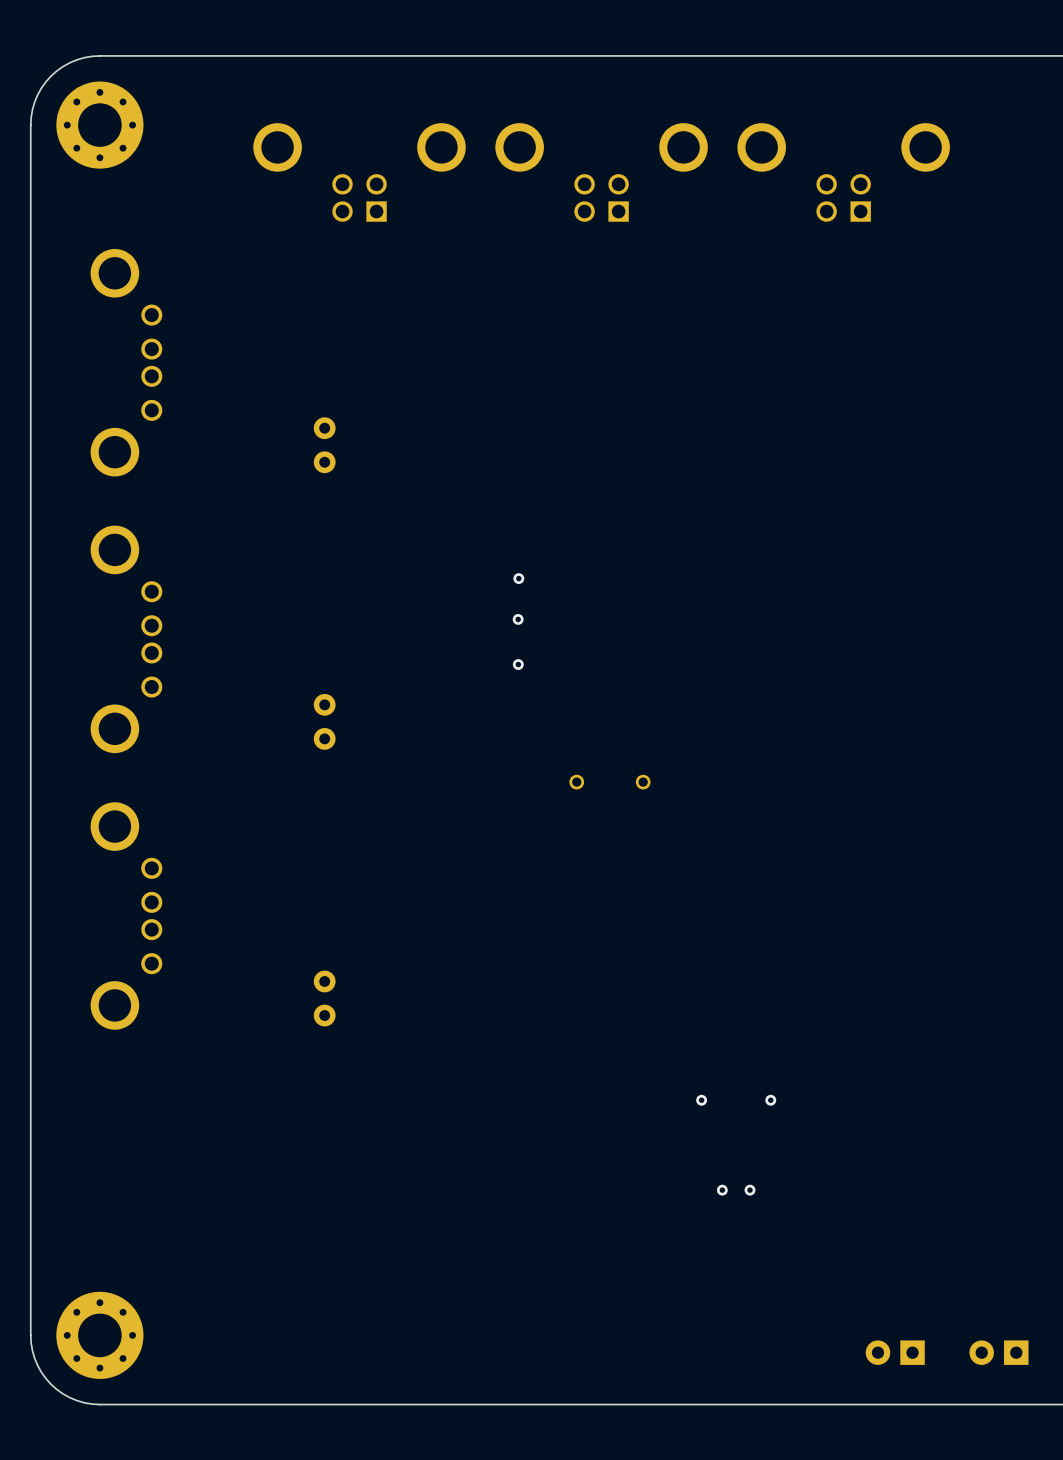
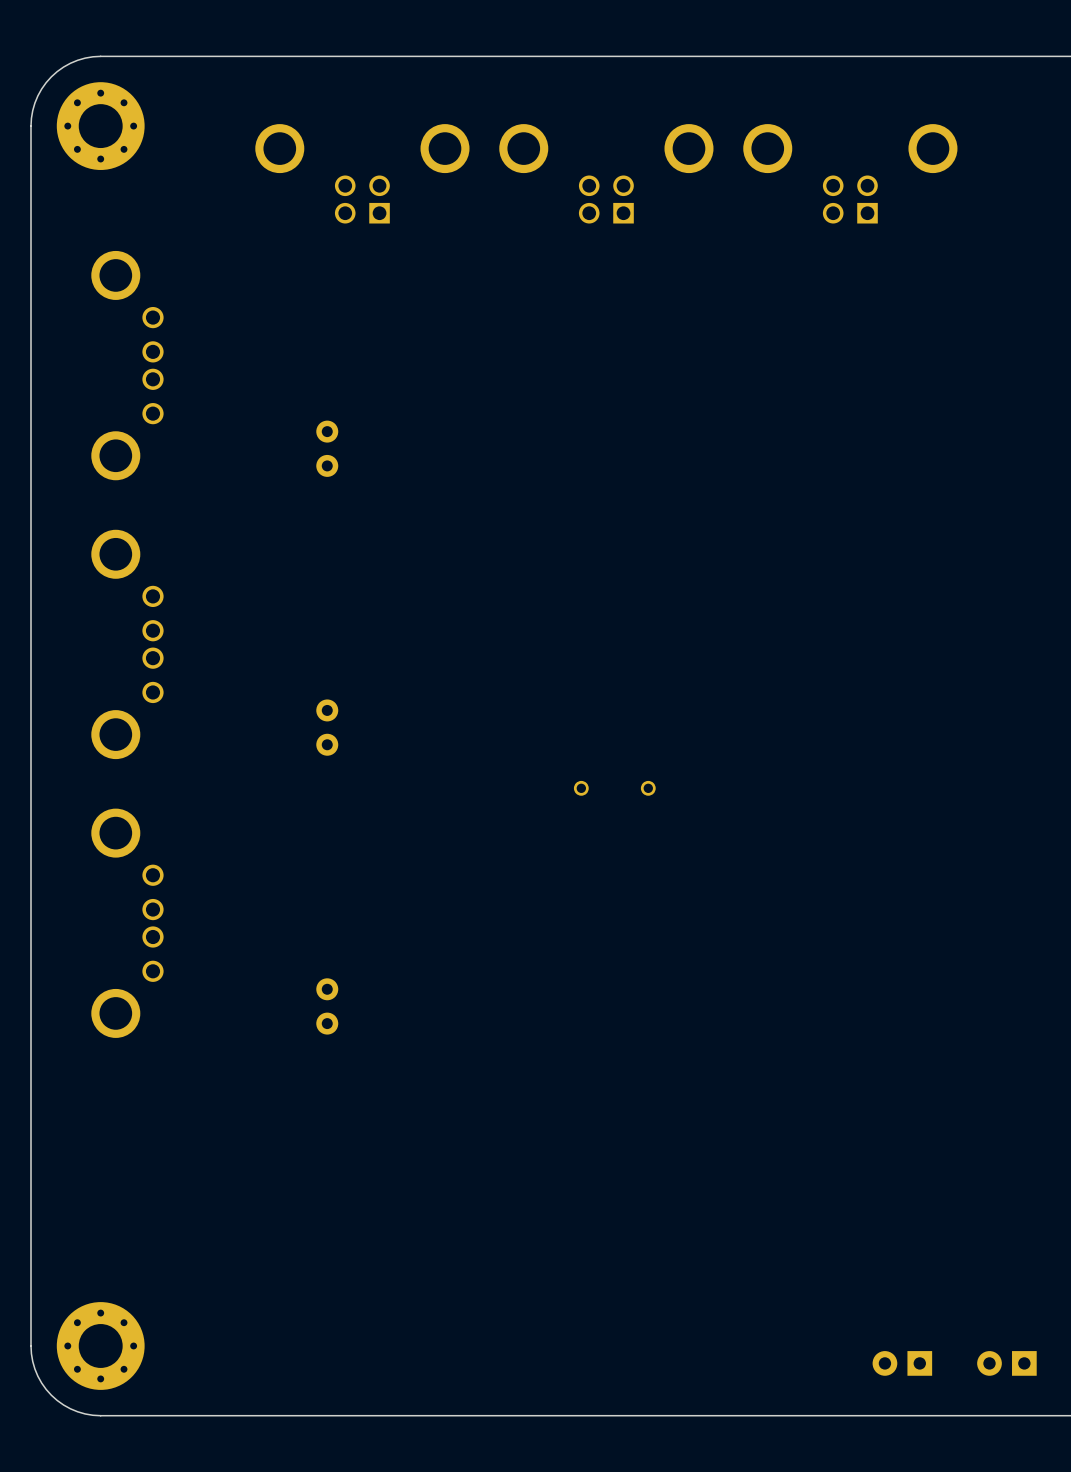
via: (518, 578) -> none
via: (518, 619) -> none
via: (518, 664) -> none
via: (701, 1100) -> none
via: (770, 1100) -> none
via: (722, 1190) -> none
via: (750, 1190) -> none

